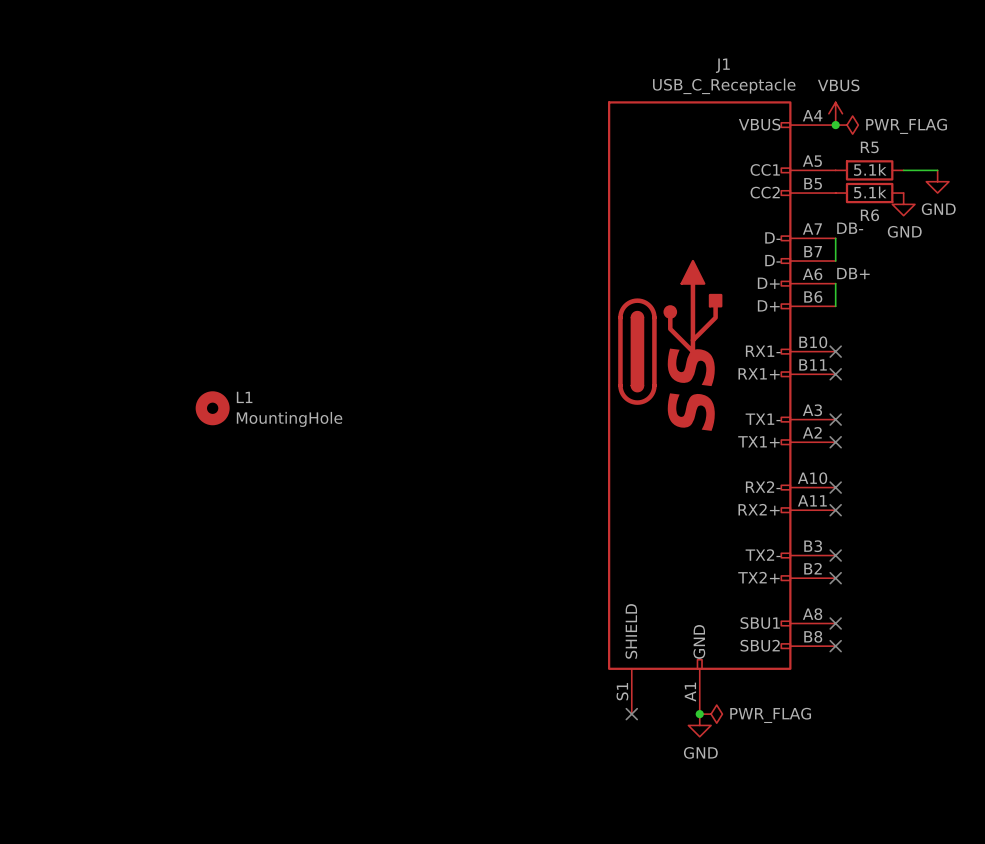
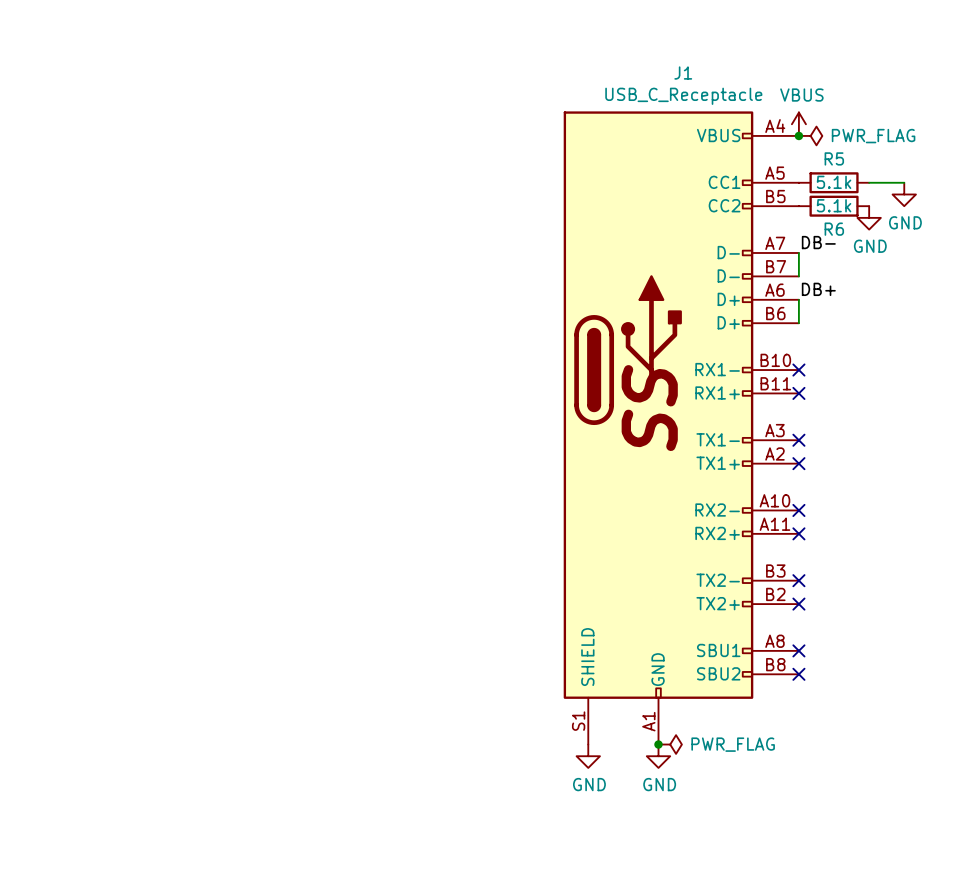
L1: MountingHole (212, 408) -> none
no-connect mark: (631, 714) -> none
power symbol: none -> GND (588, 756)

